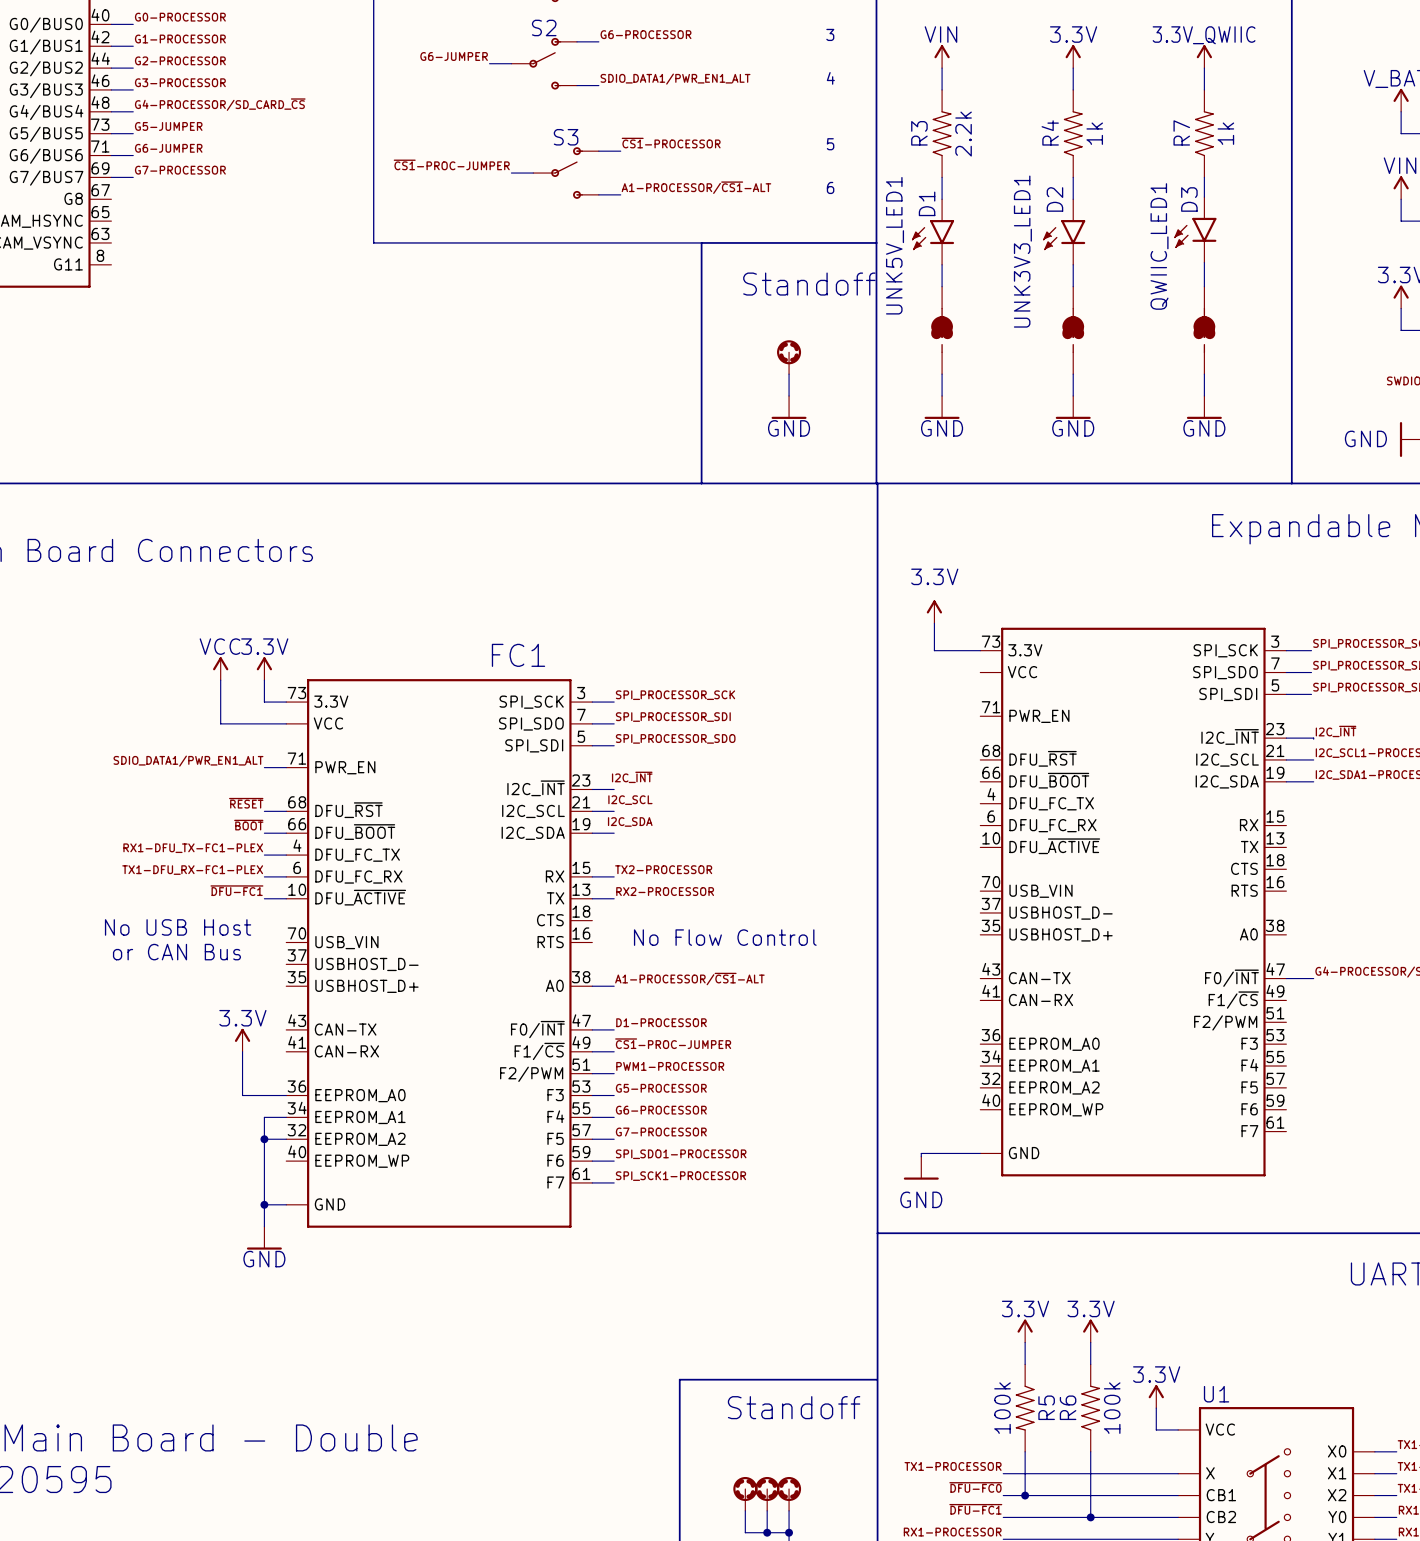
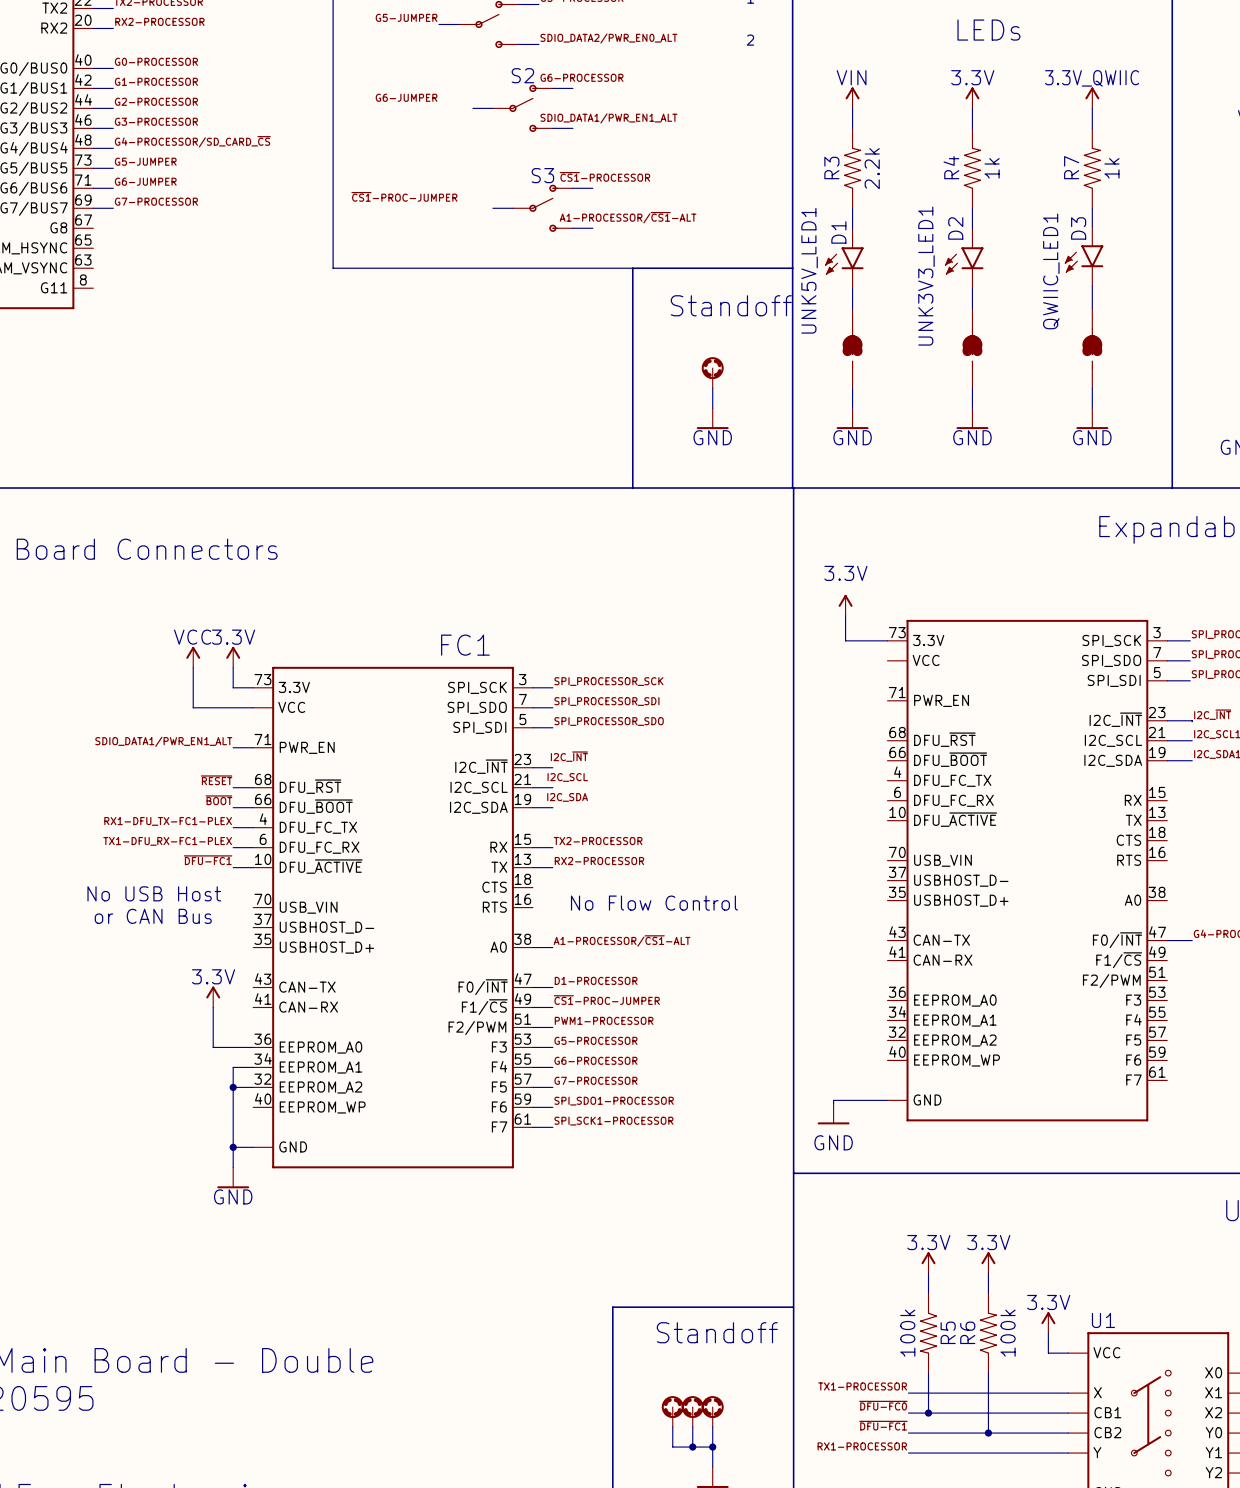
text: 3 (830, 34) -> none
wire: (577, 41) (598, 41) -> (552, 88) (572, 88)
wire: (489, 63) (511, 63) -> (472, 108) (492, 108)
S2 position: (544, 63) -> (522, 108)
text: 4 (830, 78) -> none
wire: (577, 85) (598, 85) -> (552, 128) (572, 128)
text: 5 (830, 144) -> none
wire: (598, 151) (620, 151) -> (572, 188) (592, 188)
wire: (511, 173) (533, 173) -> (492, 208) (512, 208)
S3 position: (566, 173) -> (542, 208)
text: 6 (830, 187) -> none
wire: (598, 194) (620, 194) -> (572, 228) (592, 228)

